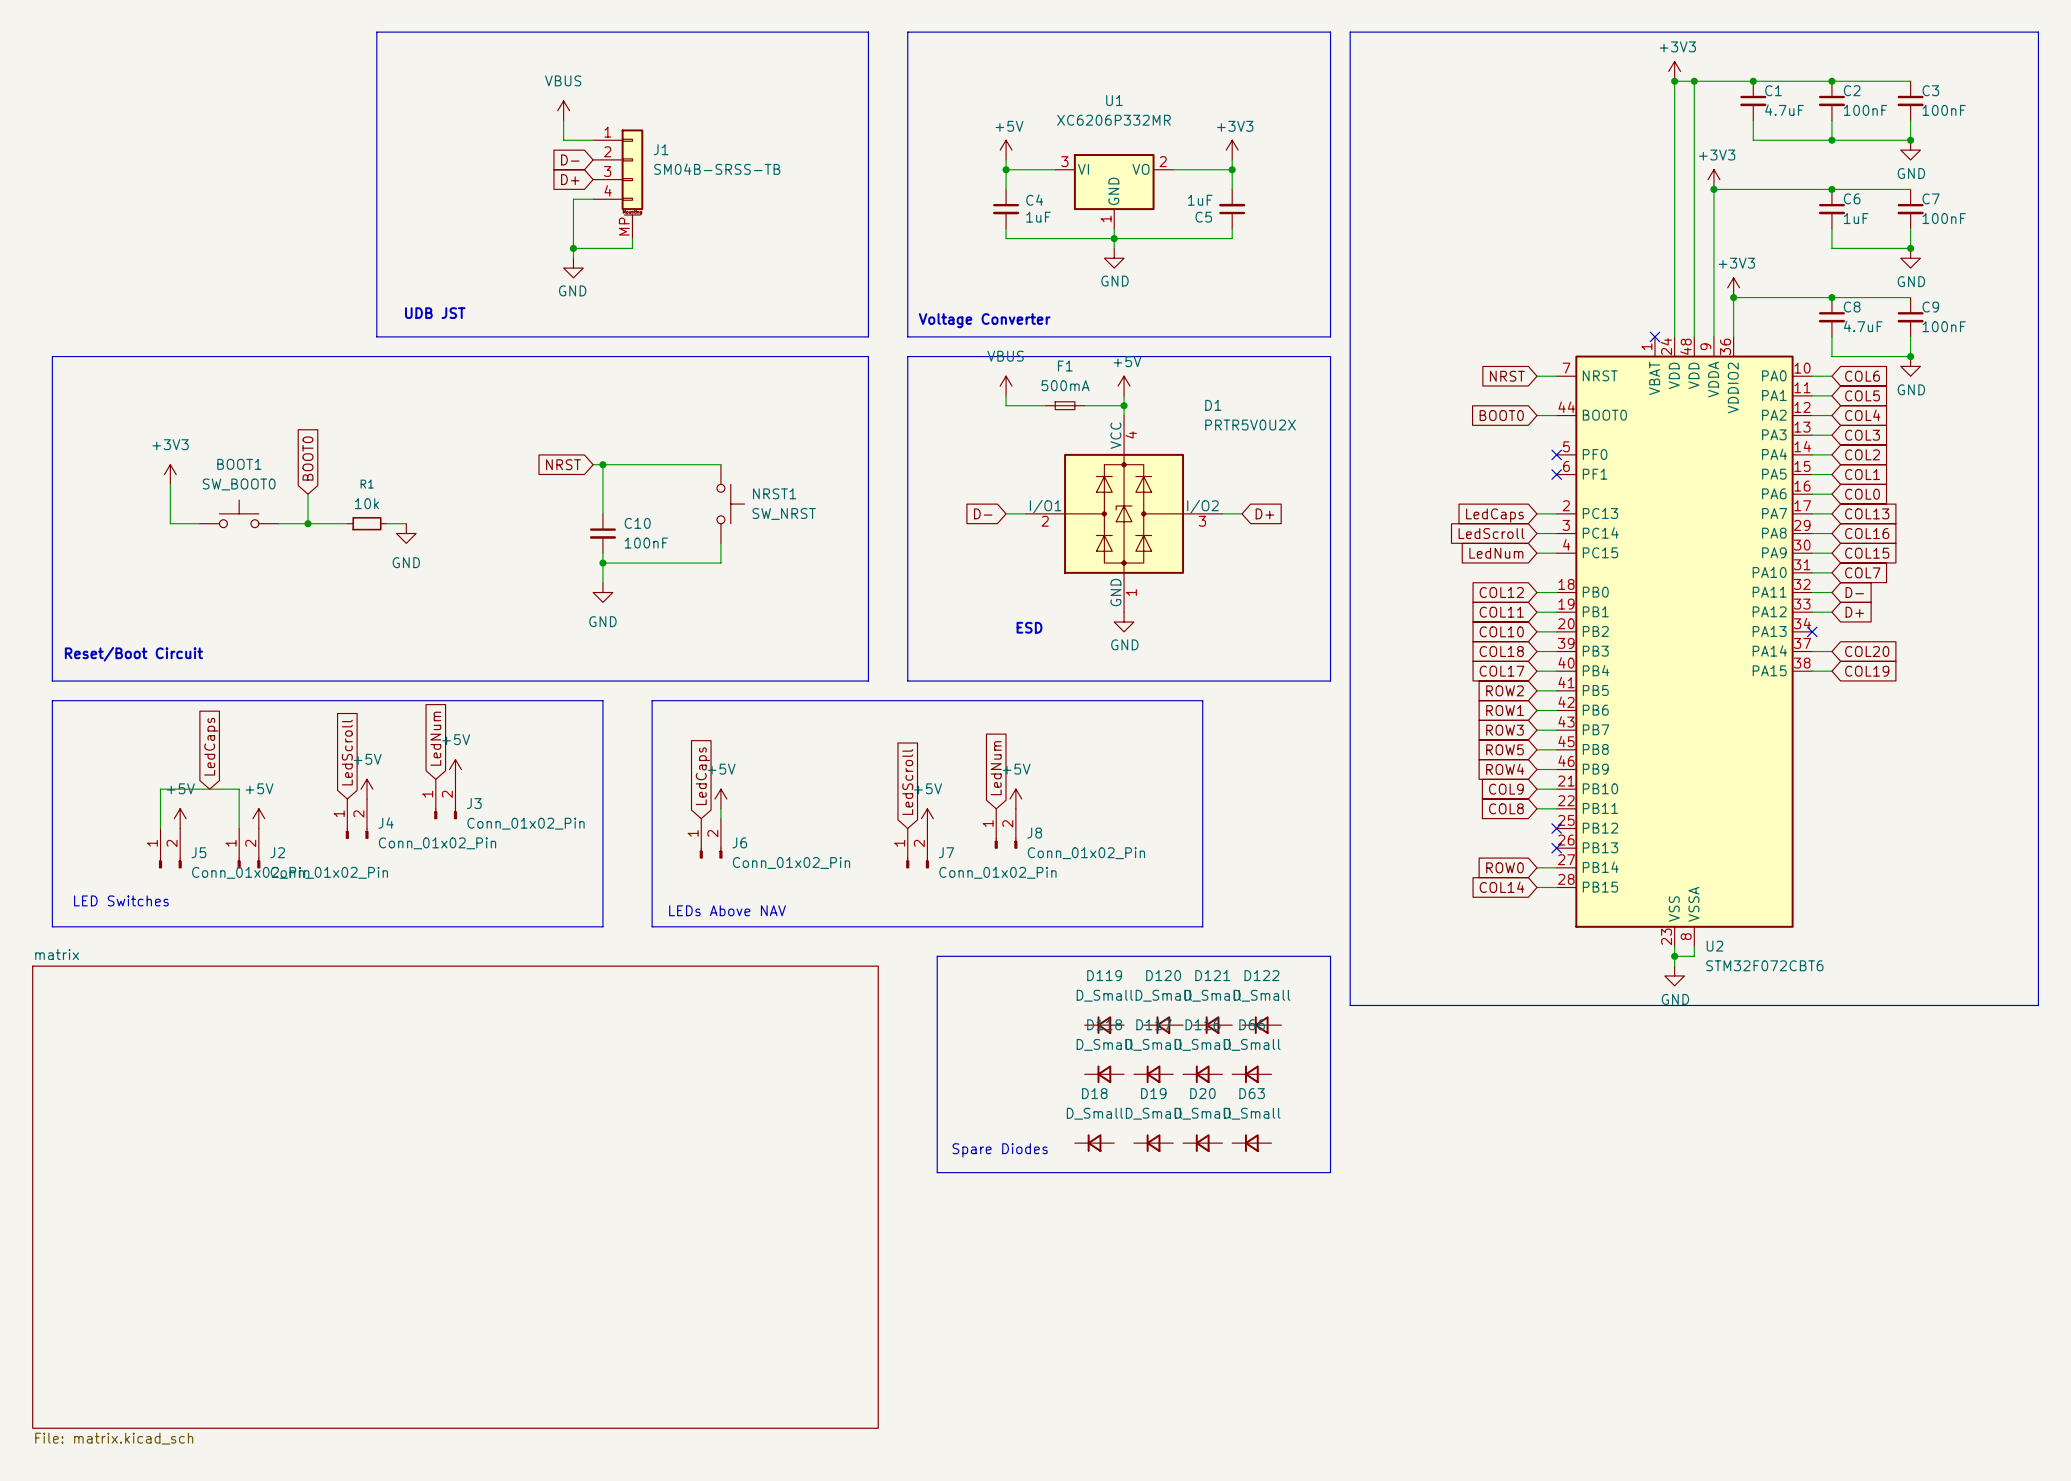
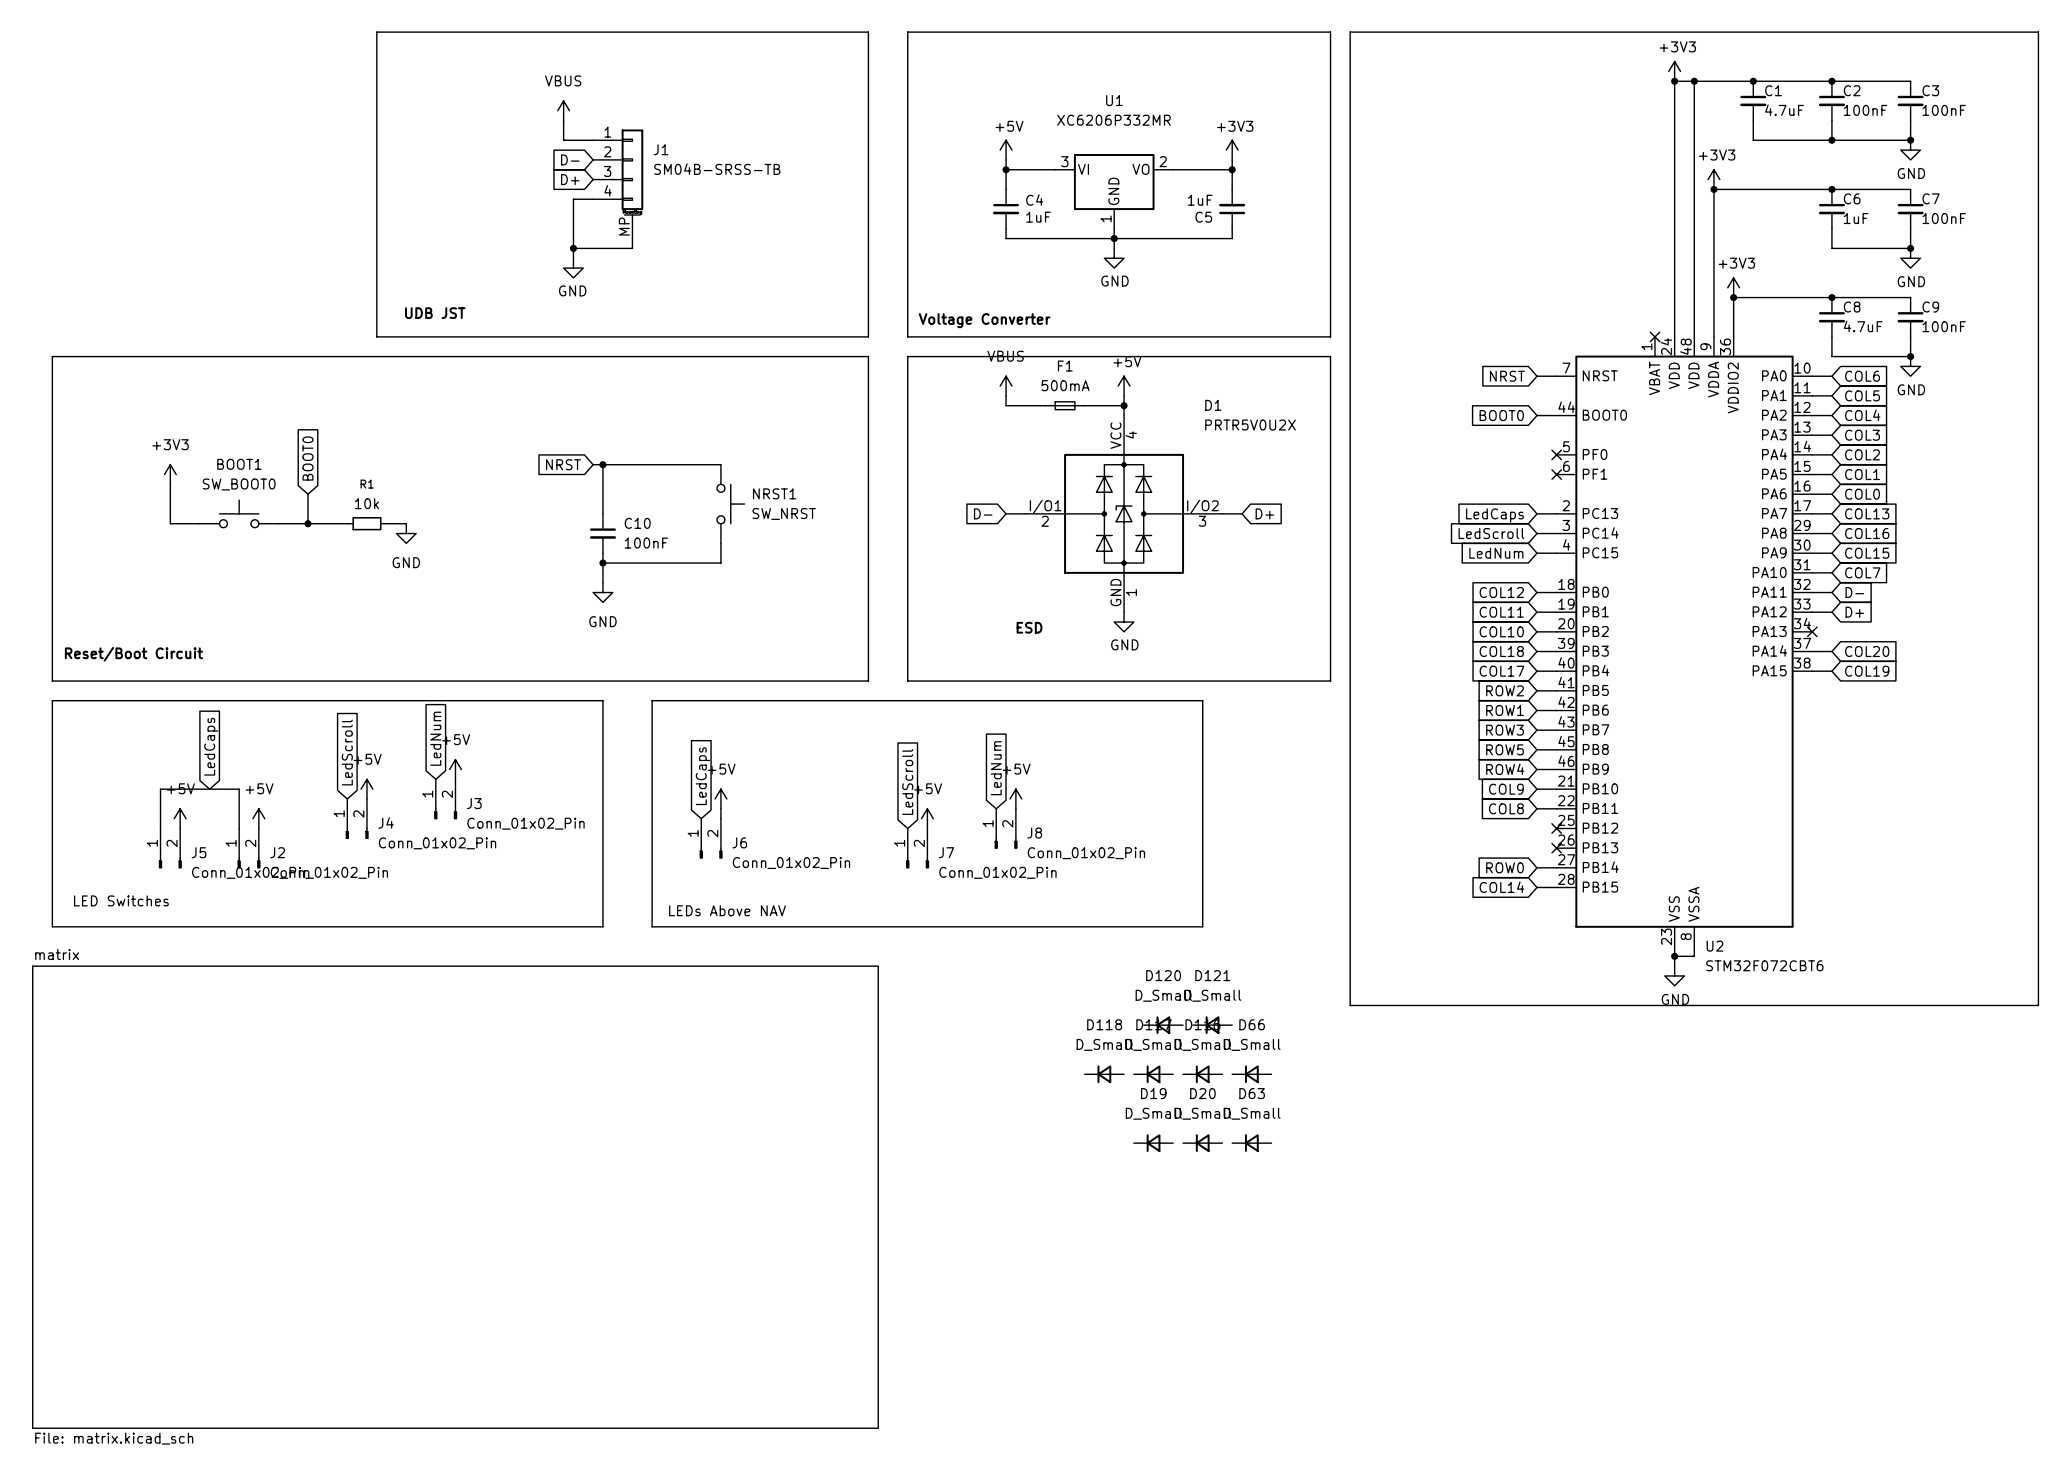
line: (937, 956) (1330, 956) (1330, 1172) (937, 1172) (937, 956) -> none
D119: D_Small (1104, 1025) -> none
D122: D_Small (1261, 1025) -> none
D18: D_Small (1094, 1143) -> none
text: Spare Diodes (1000, 1150) -> none

